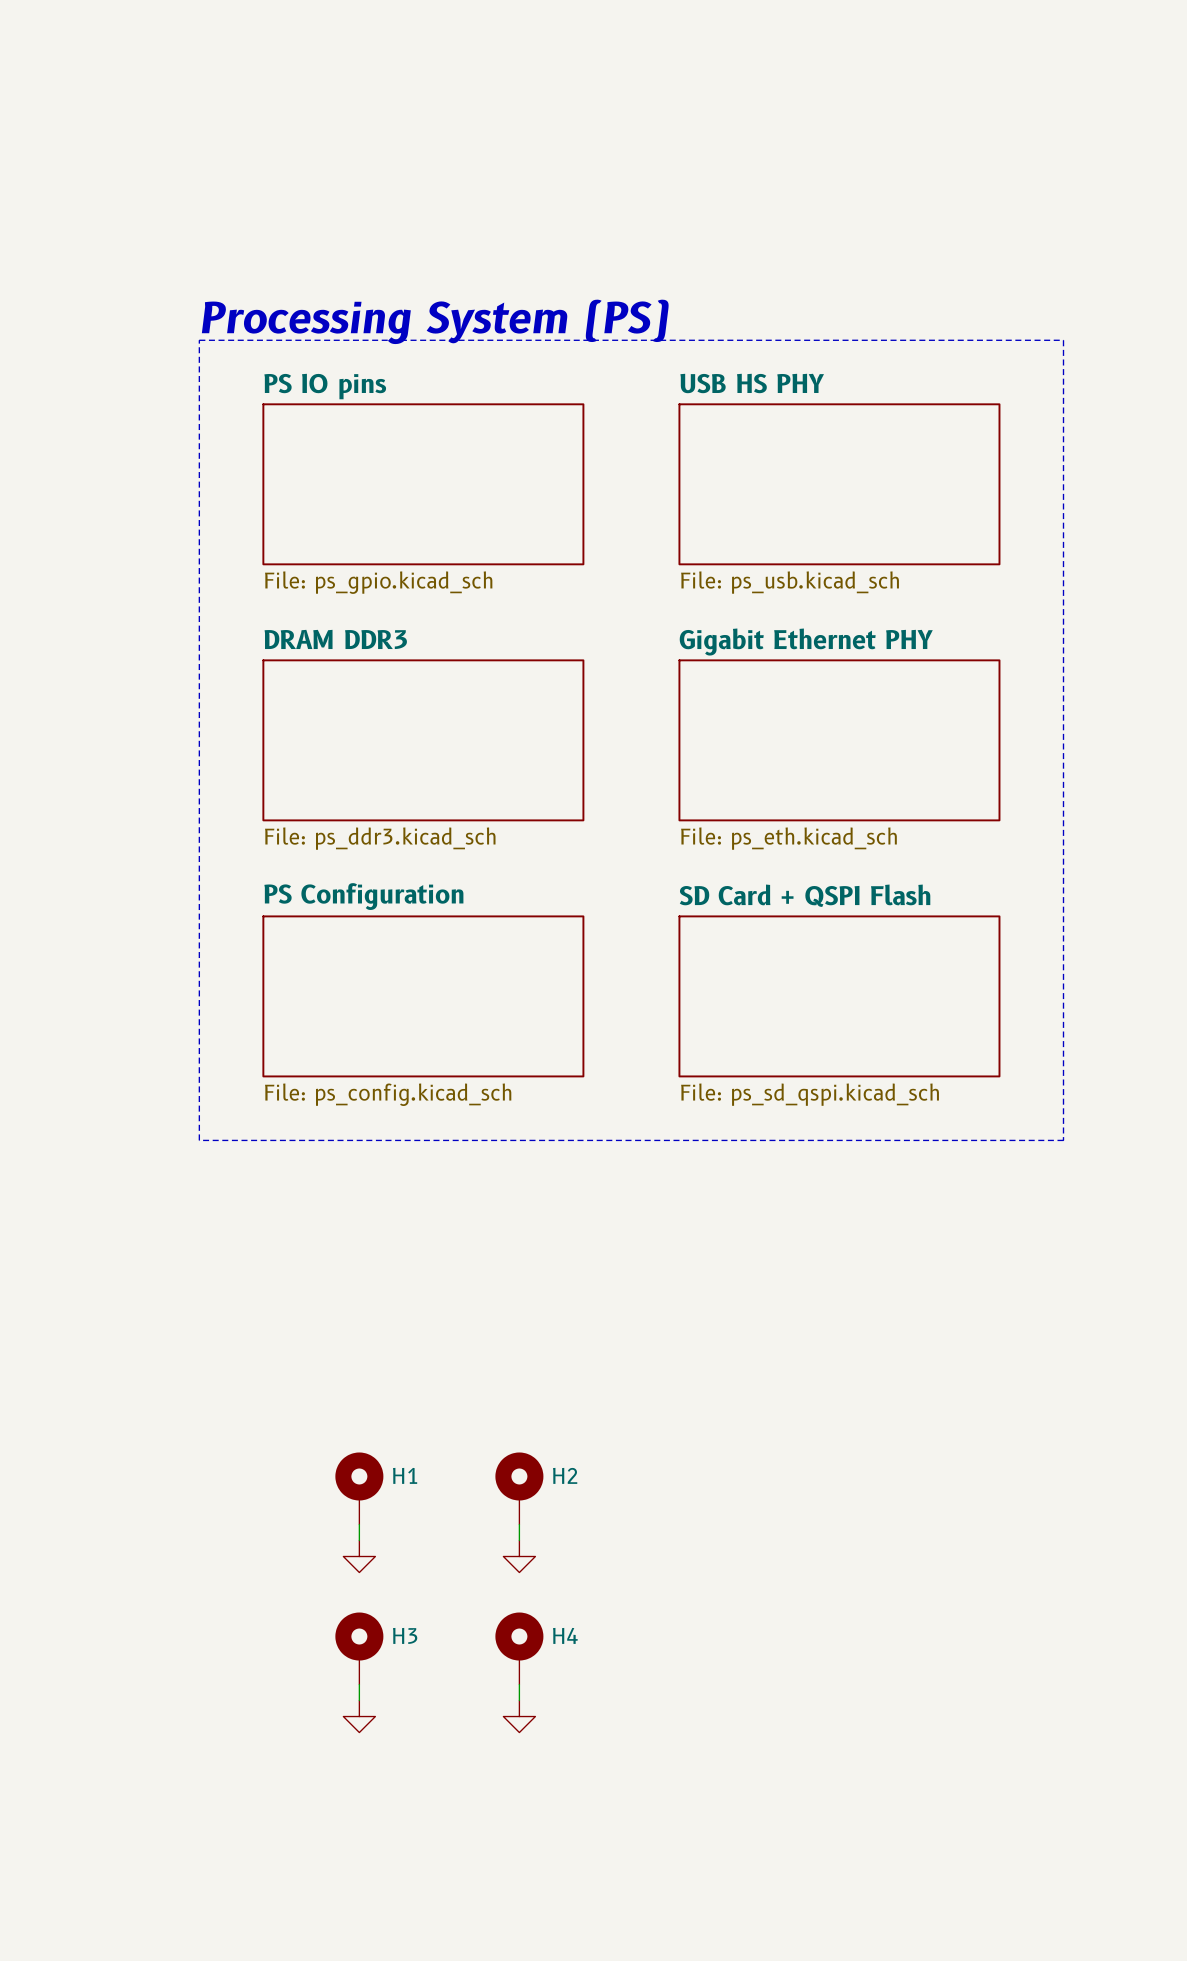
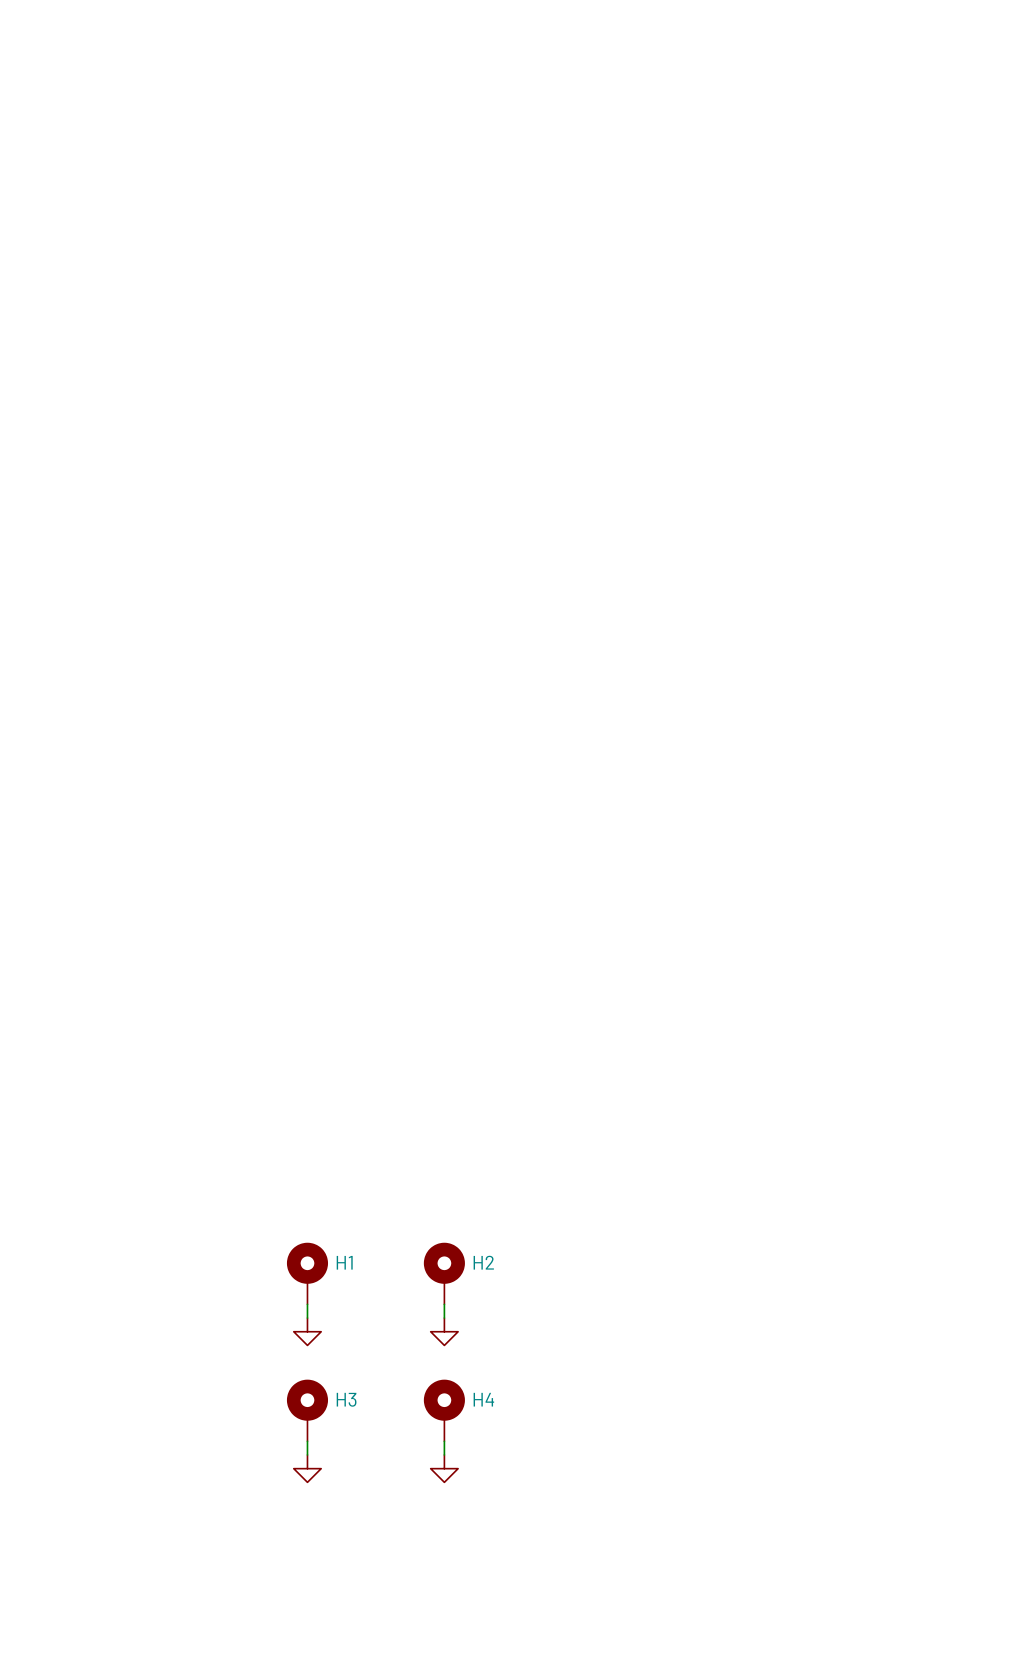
text: Processing System (PS) (435, 321) -> none
line: (199, 340) (1063, 340) (1063, 1140) (199, 1140) (199, 340) -> none
sheet PS IO pins: File: ps_gpio.kicad_sch (423, 484) -> none
sheet USB HS PHY: File: ps_usb.kicad_sch (839, 484) -> none
sheet DRAM DDR3: File: ps_ddr3.kicad_sch (423, 740) -> none
sheet Gigabit Ethernet PHY: File: ps_eth.kicad_sch (839, 740) -> none
sheet PS Configuration: File: ps_config.kicad_sch (423, 996) -> none
sheet SD Card + QSPI Flash: File: ps_sd_qspi.kicad_sch (839, 996) -> none

